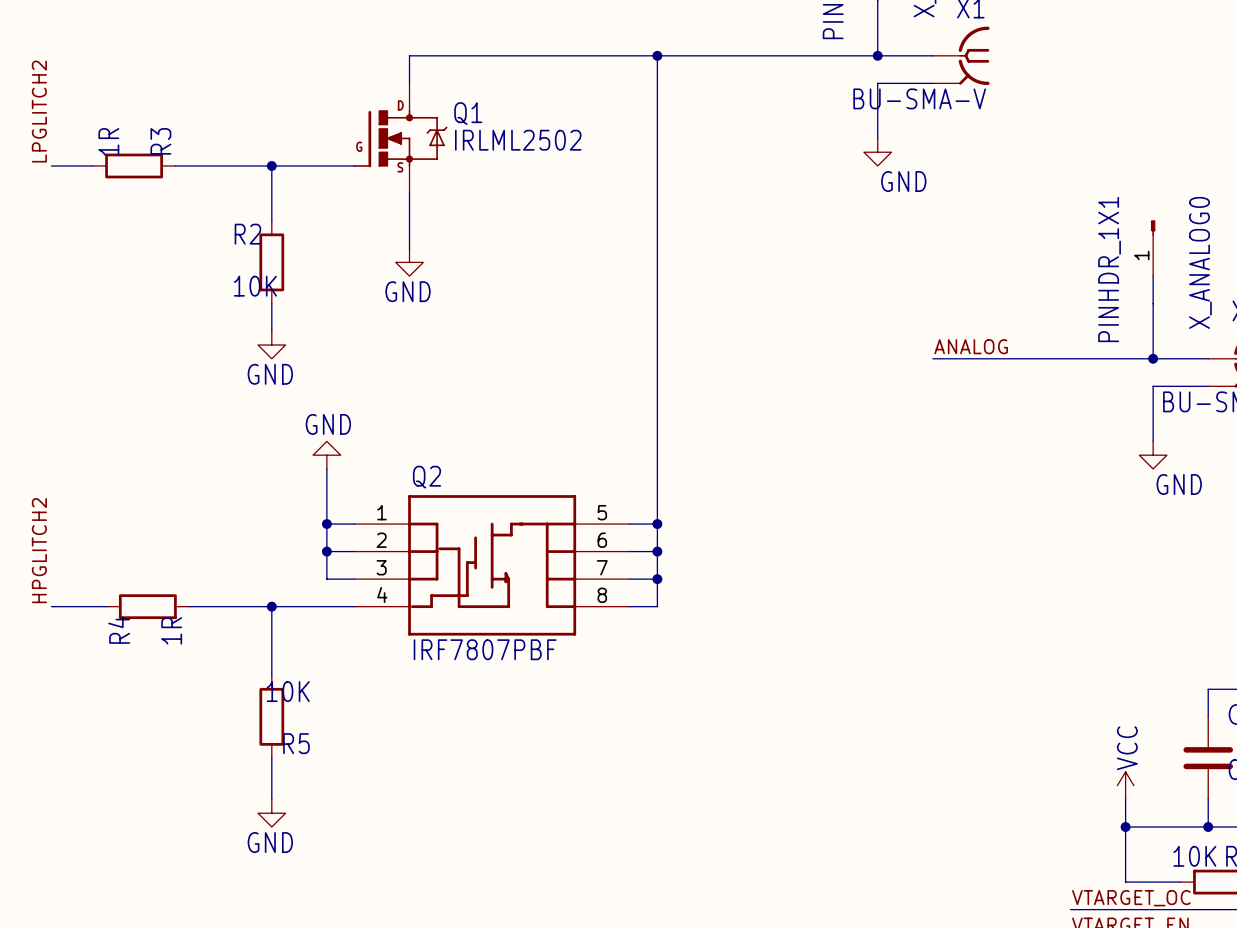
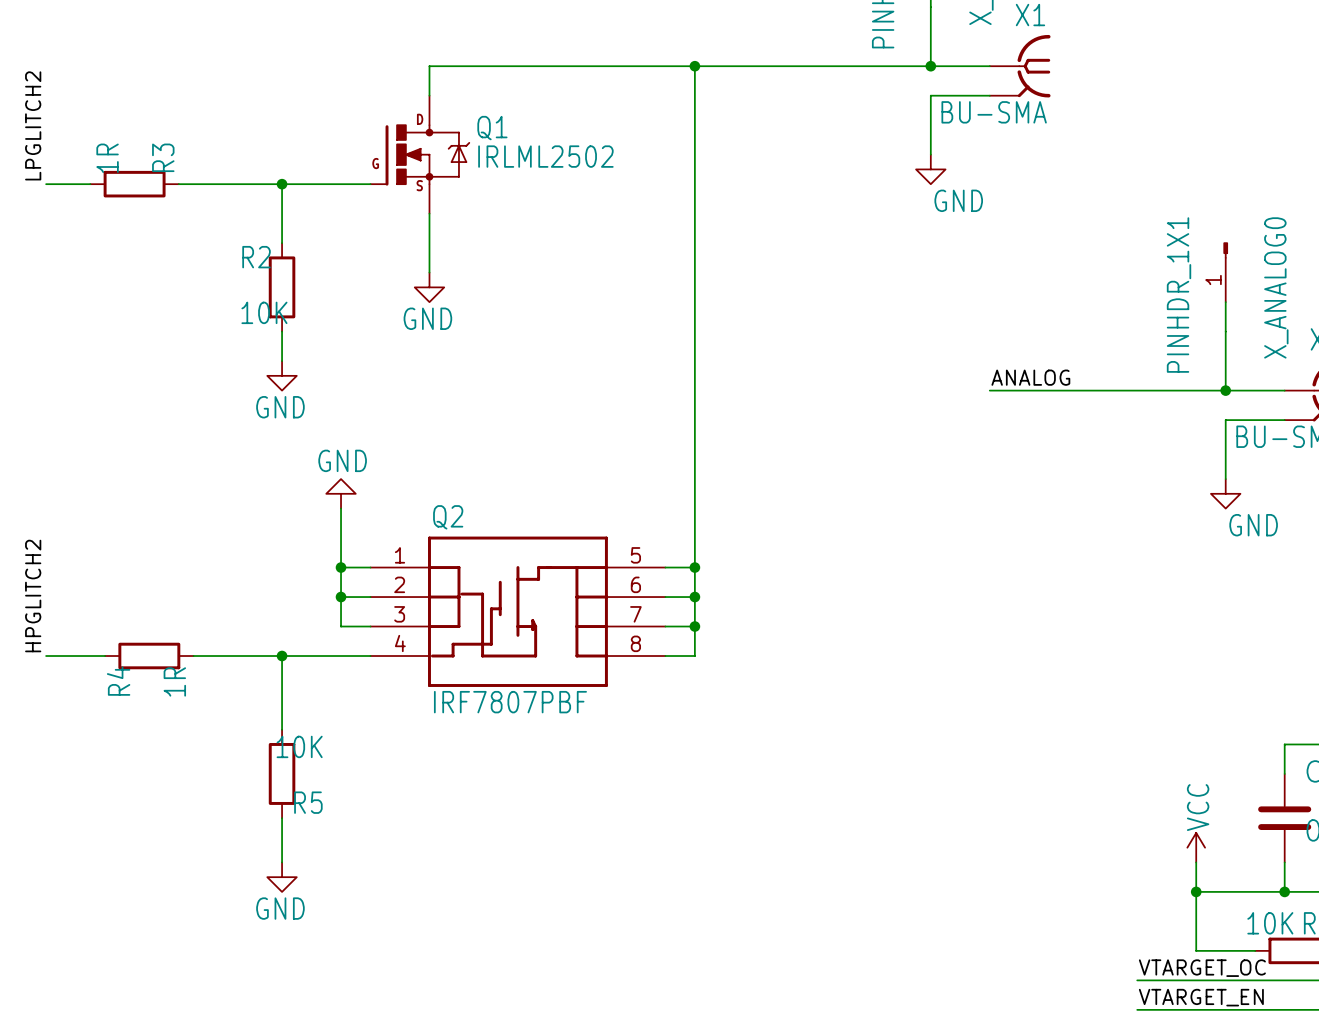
X1 value: BU-SMA-V (919, 98) -> BU-SMA (994, 112)

